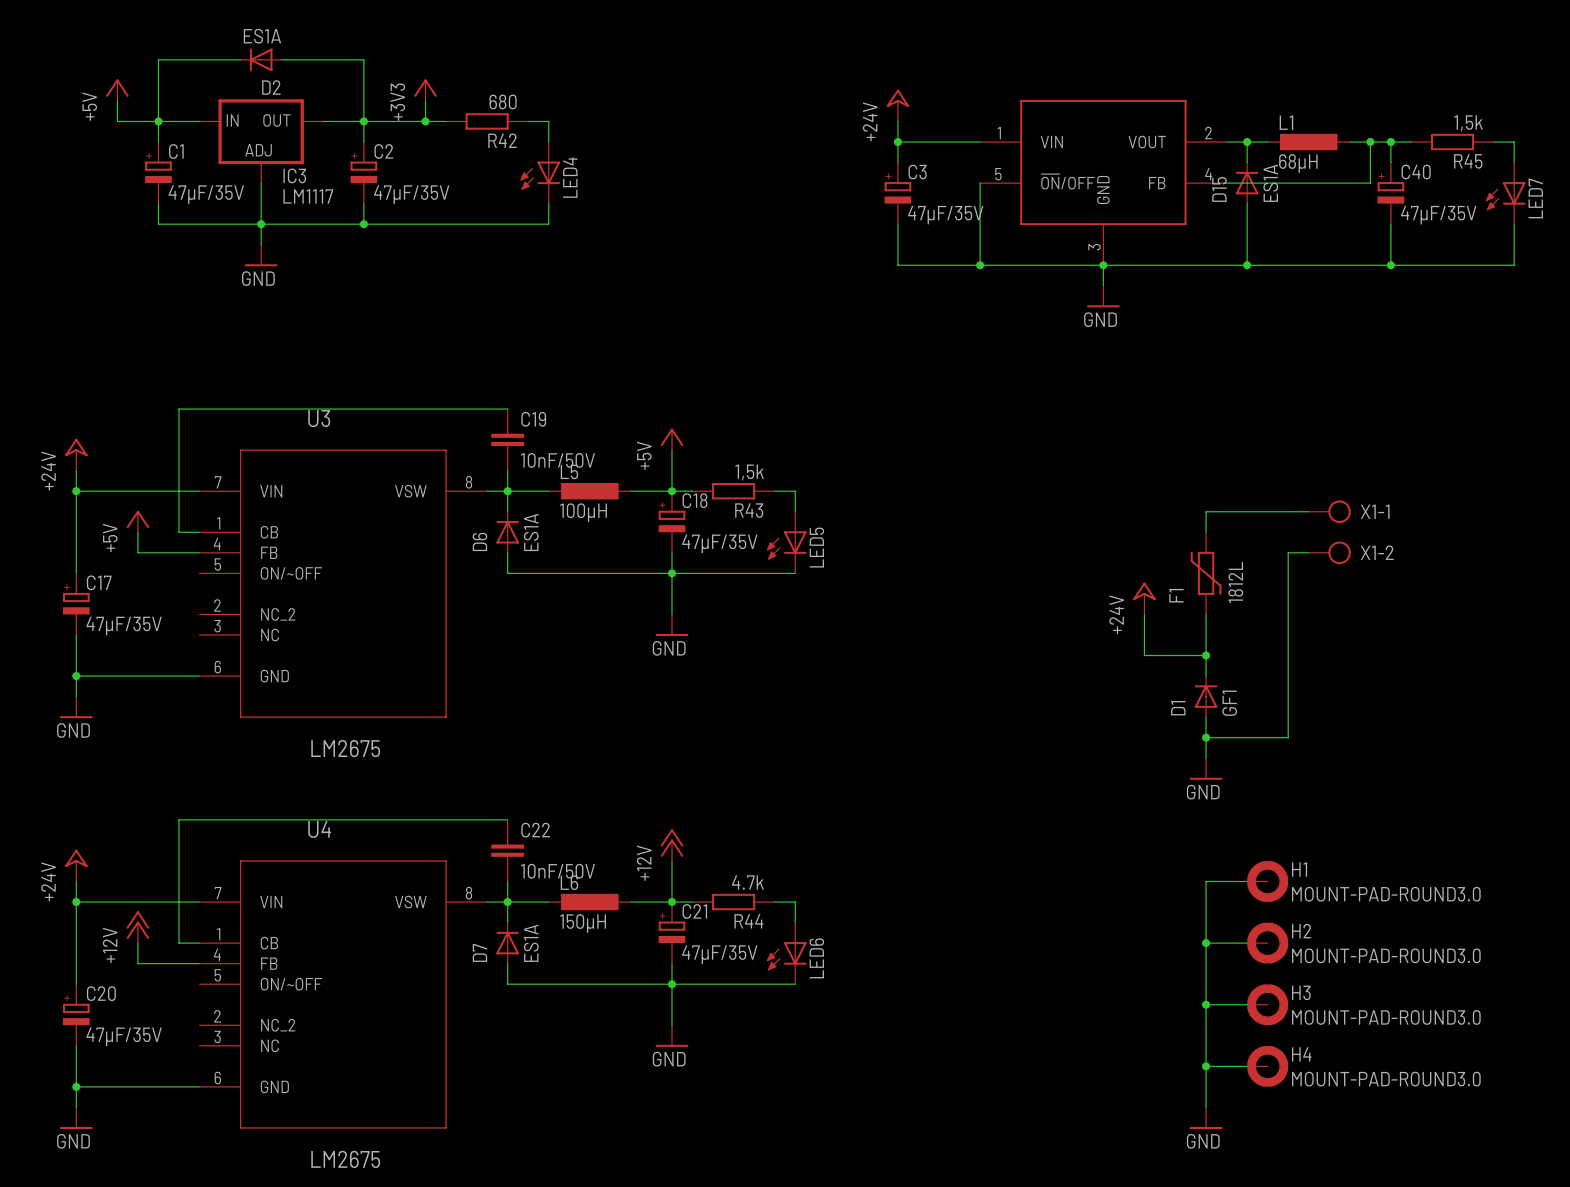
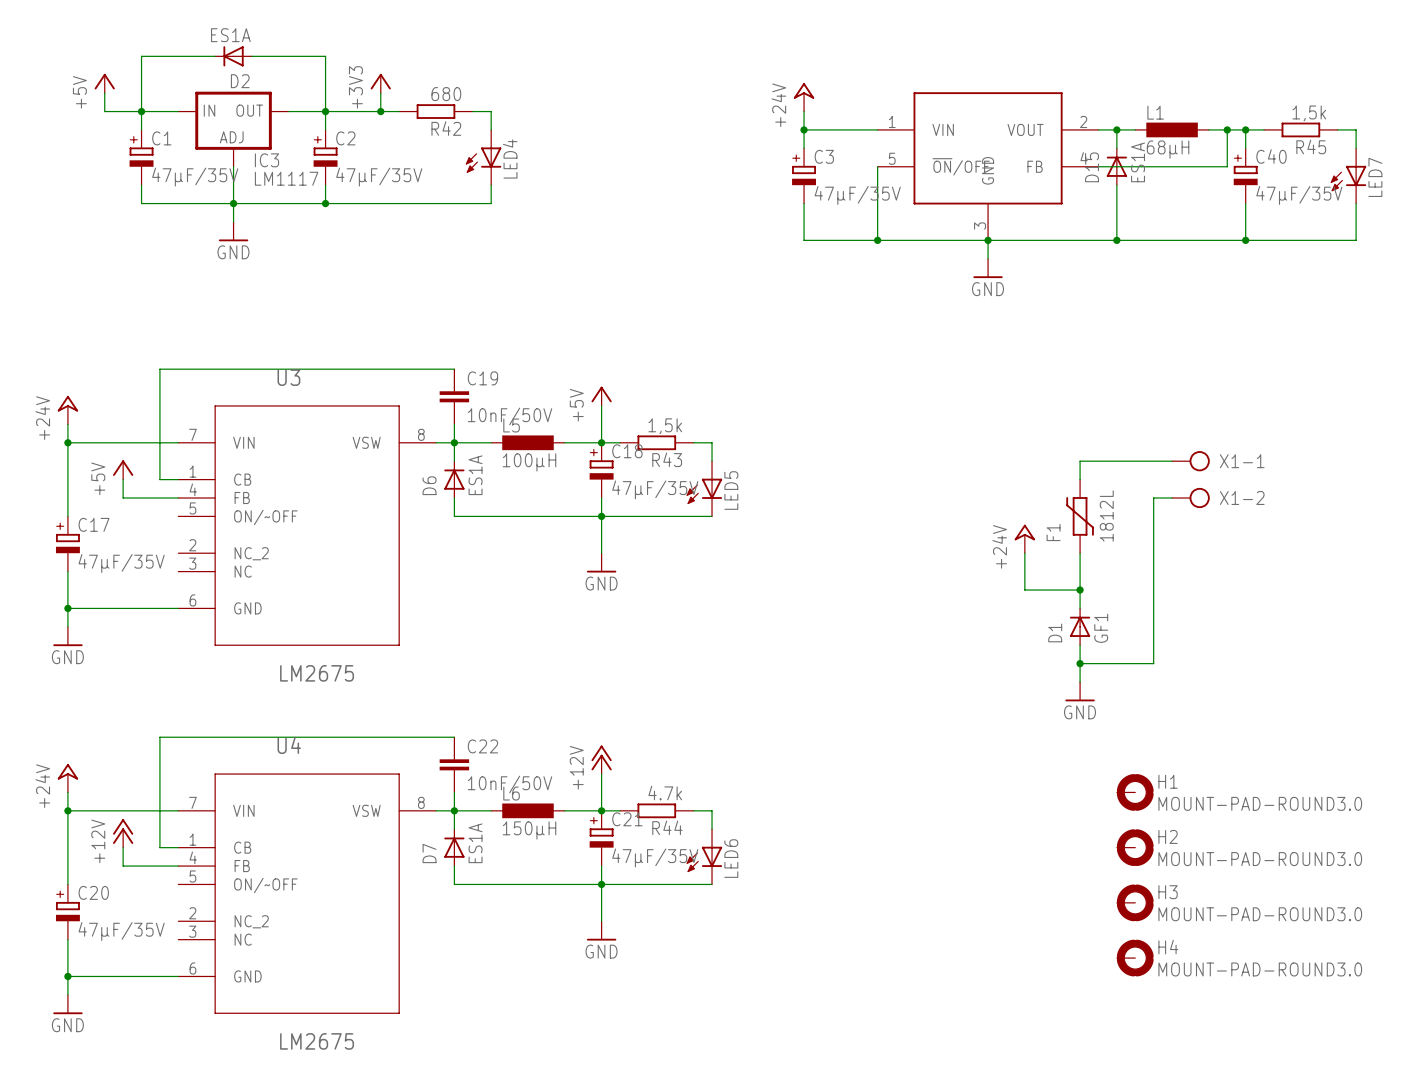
wire: (1247, 881) (1206, 881) (1206, 1107) -> none
wire: (1206, 943) (1247, 943) -> none
junction: (1206, 943) -> none
wire: (1206, 1004) (1247, 1004) -> none
junction: (1206, 1004) -> none
wire: (1206, 1066) (1247, 1066) -> none
junction: (1206, 1066) -> none
power symbol: GND (1206, 1118) -> none

